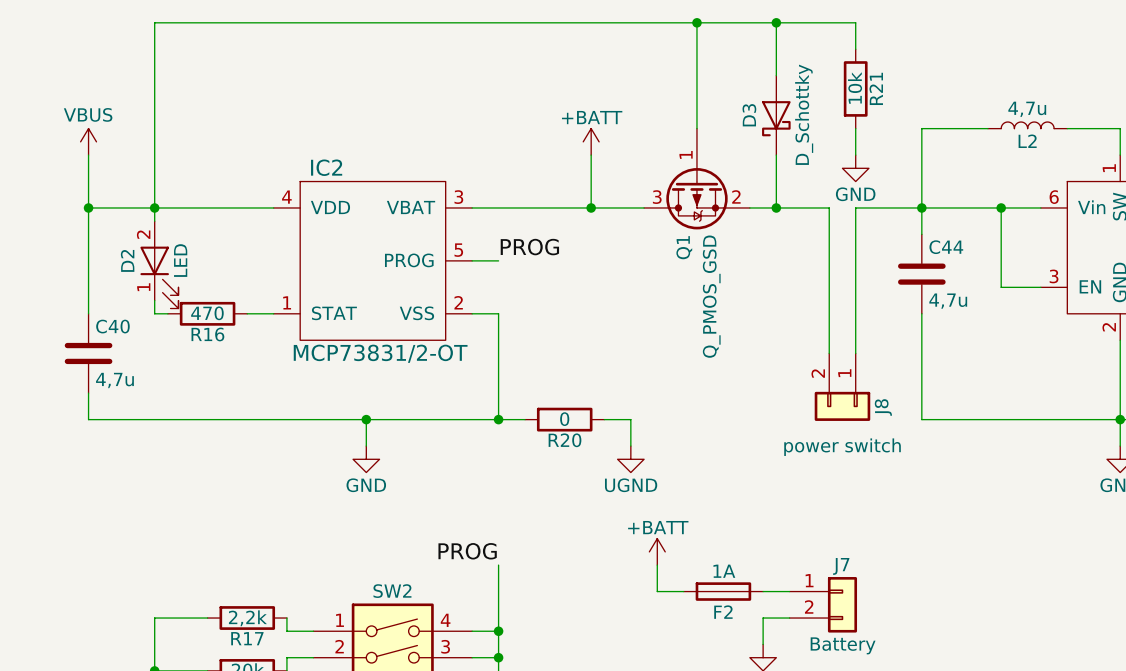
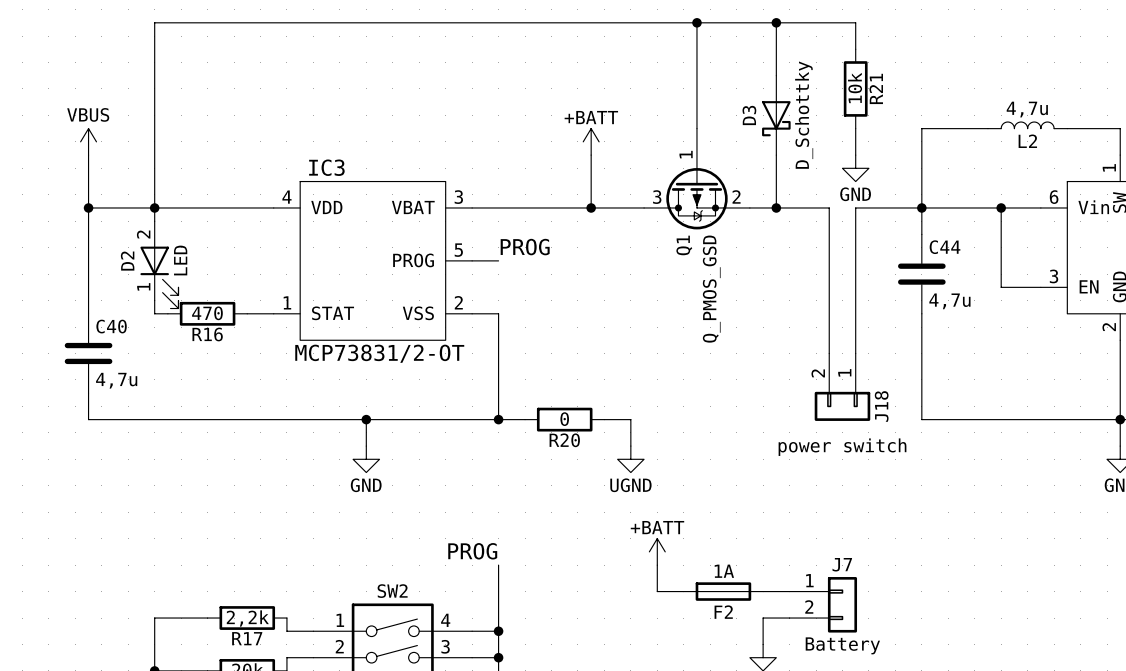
IC2 name: IC2 (326, 167) -> IC3 (326, 167)
J8 name: J8 (883, 407) -> J18 (881, 406)

